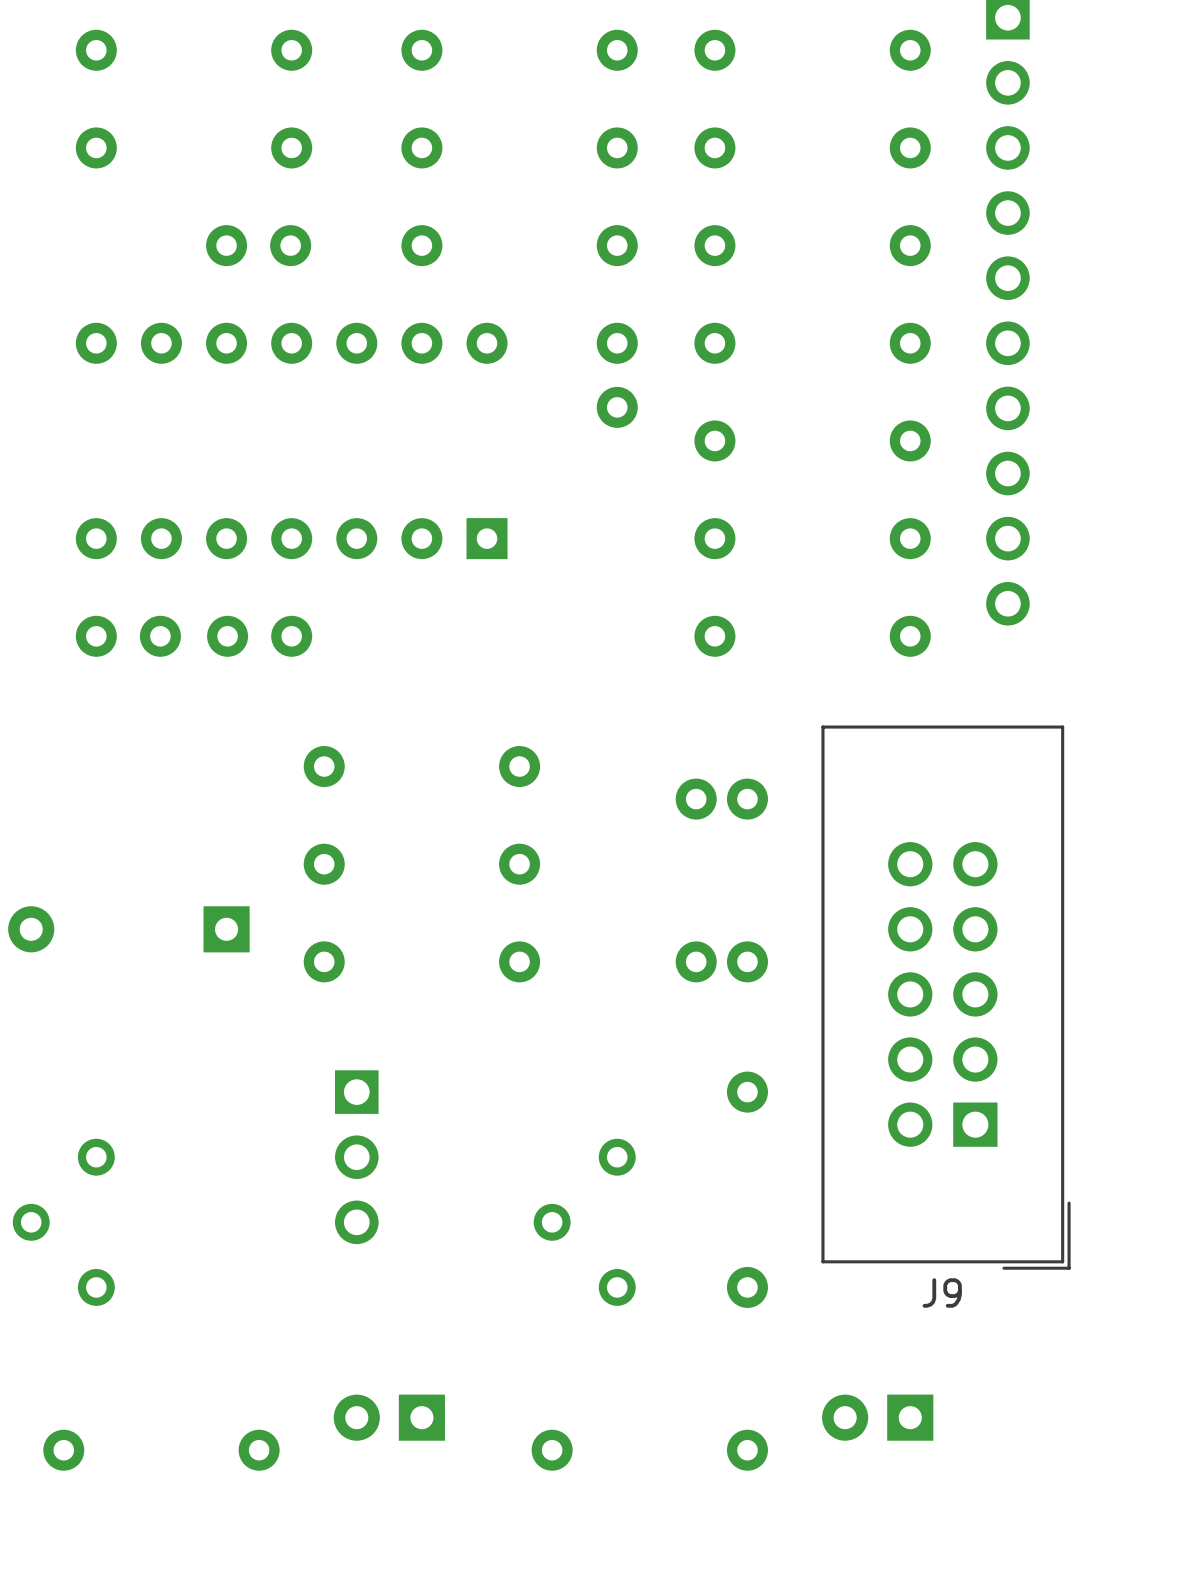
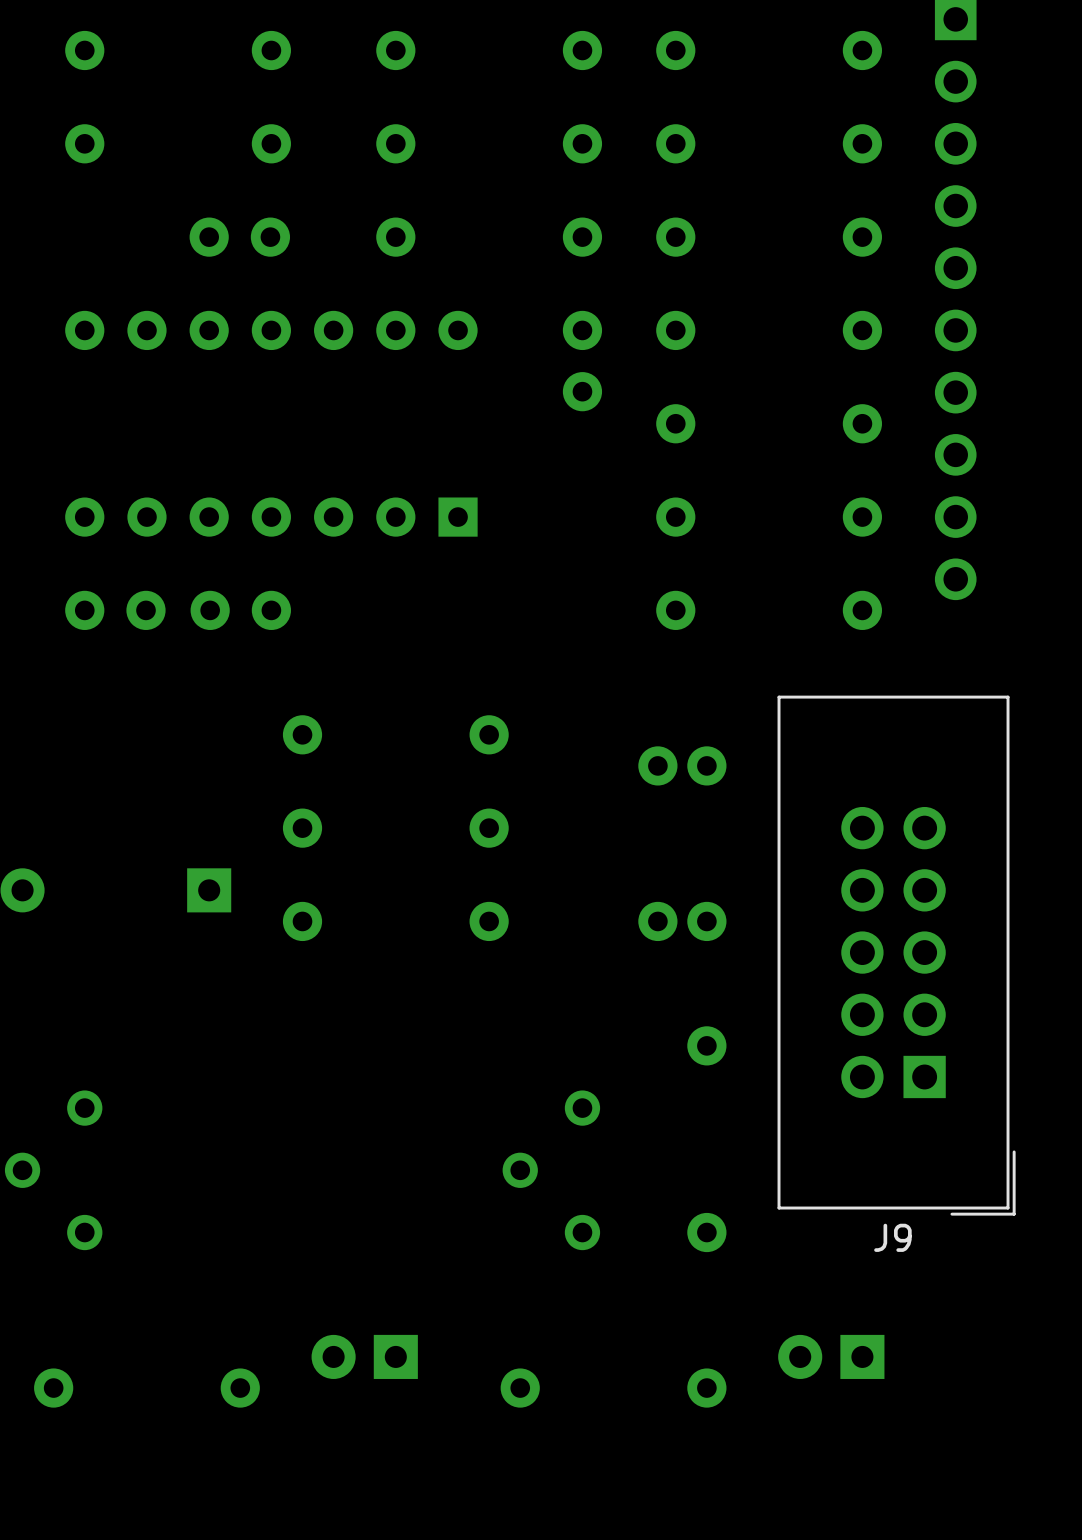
part: (356, 1157) -> none

